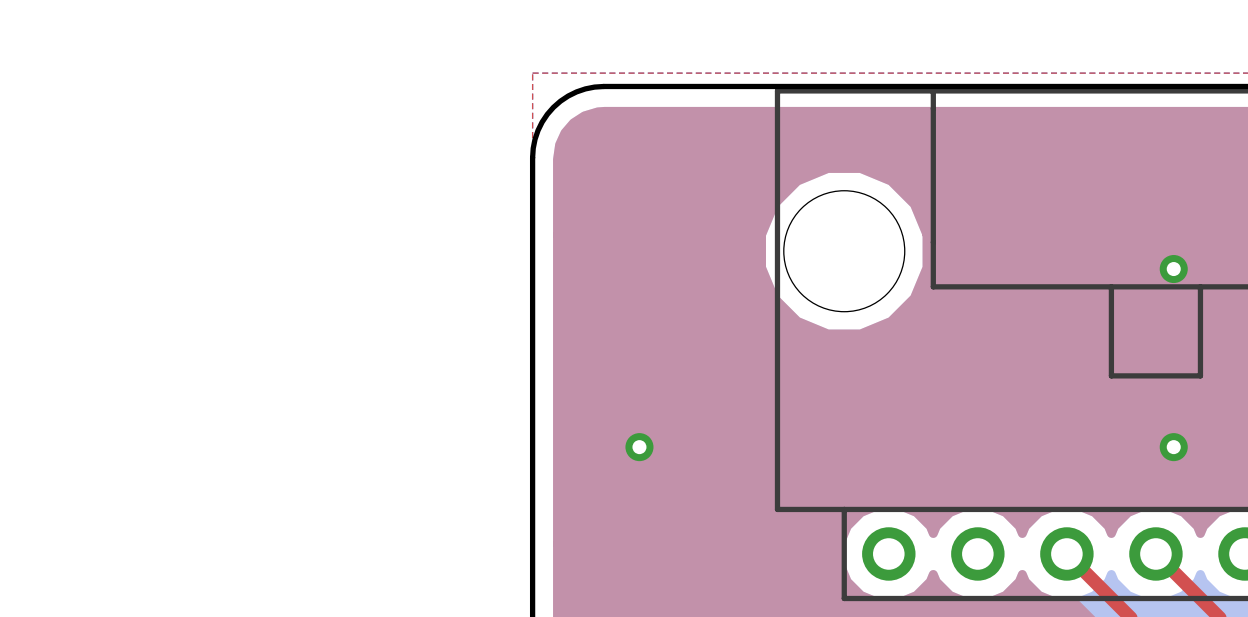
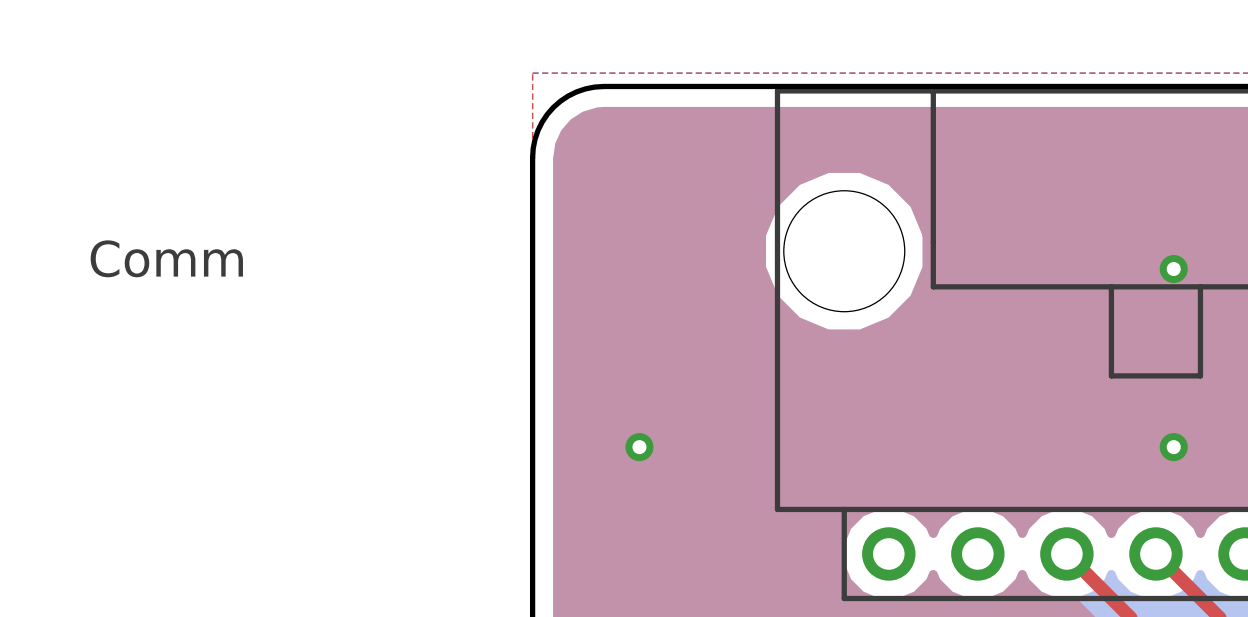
text: none -> Comm (166, 258)

